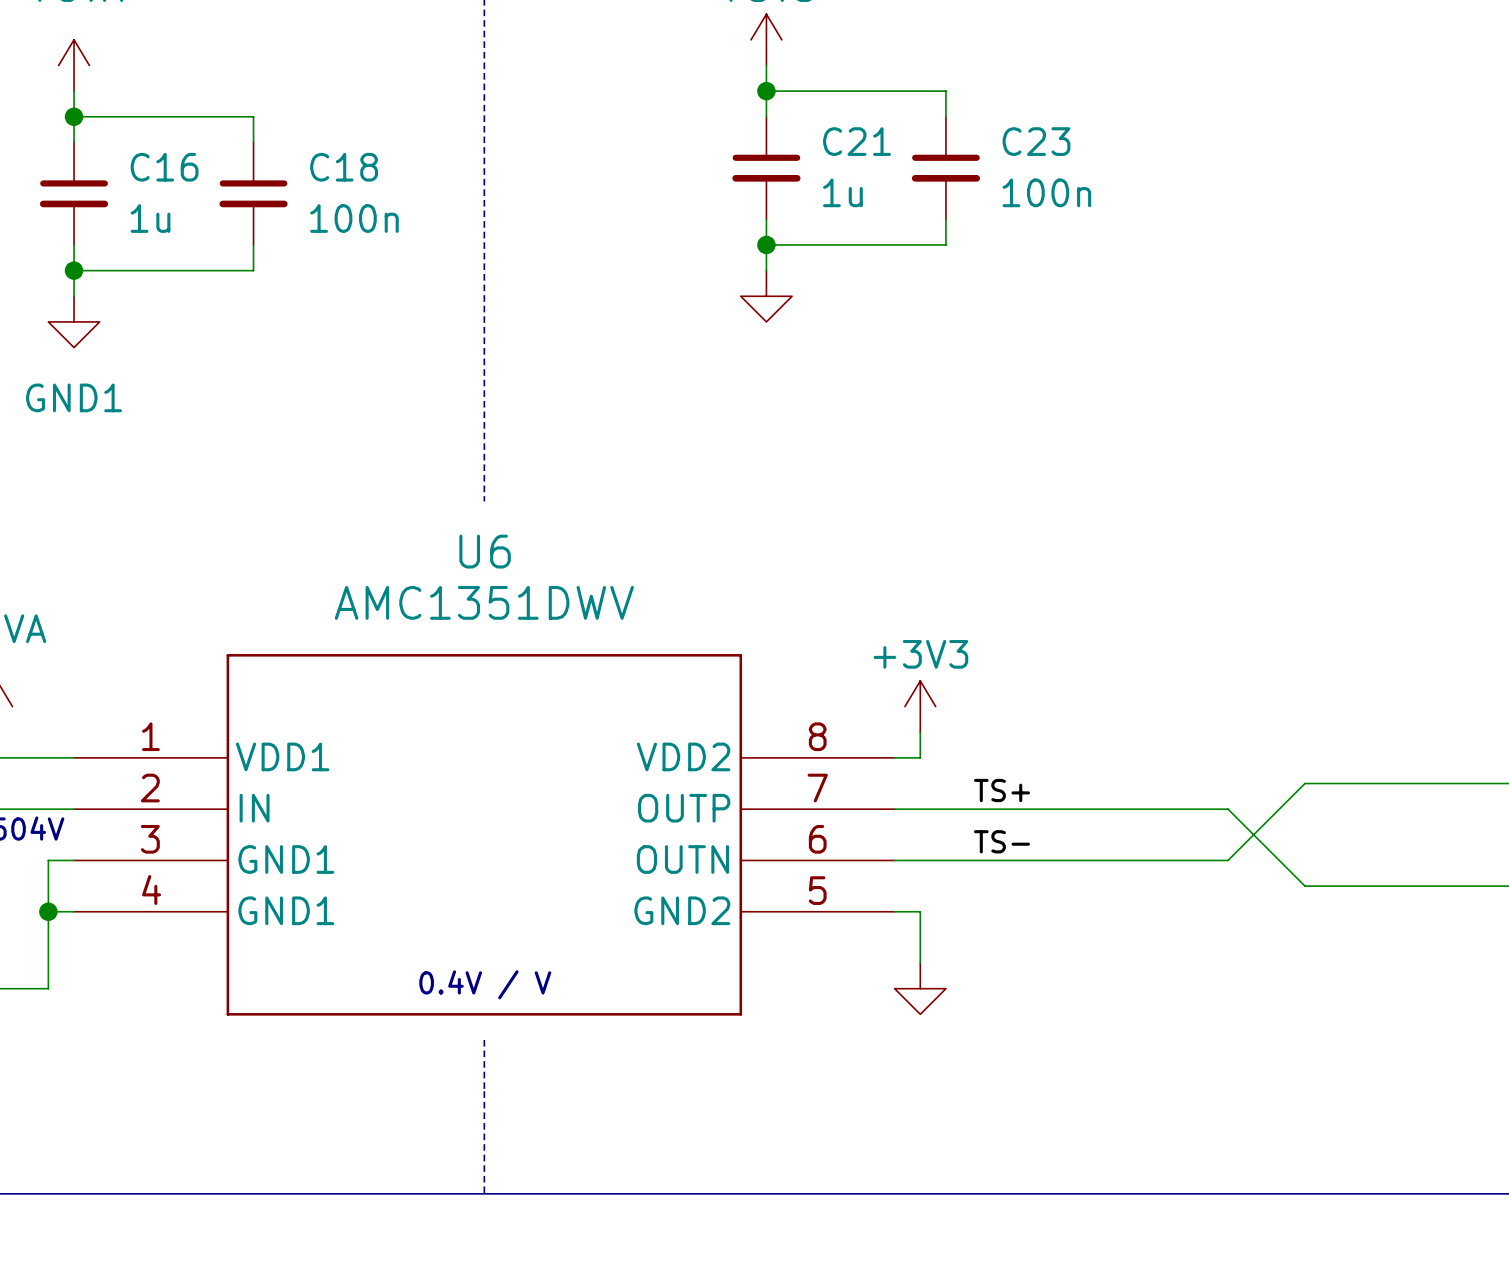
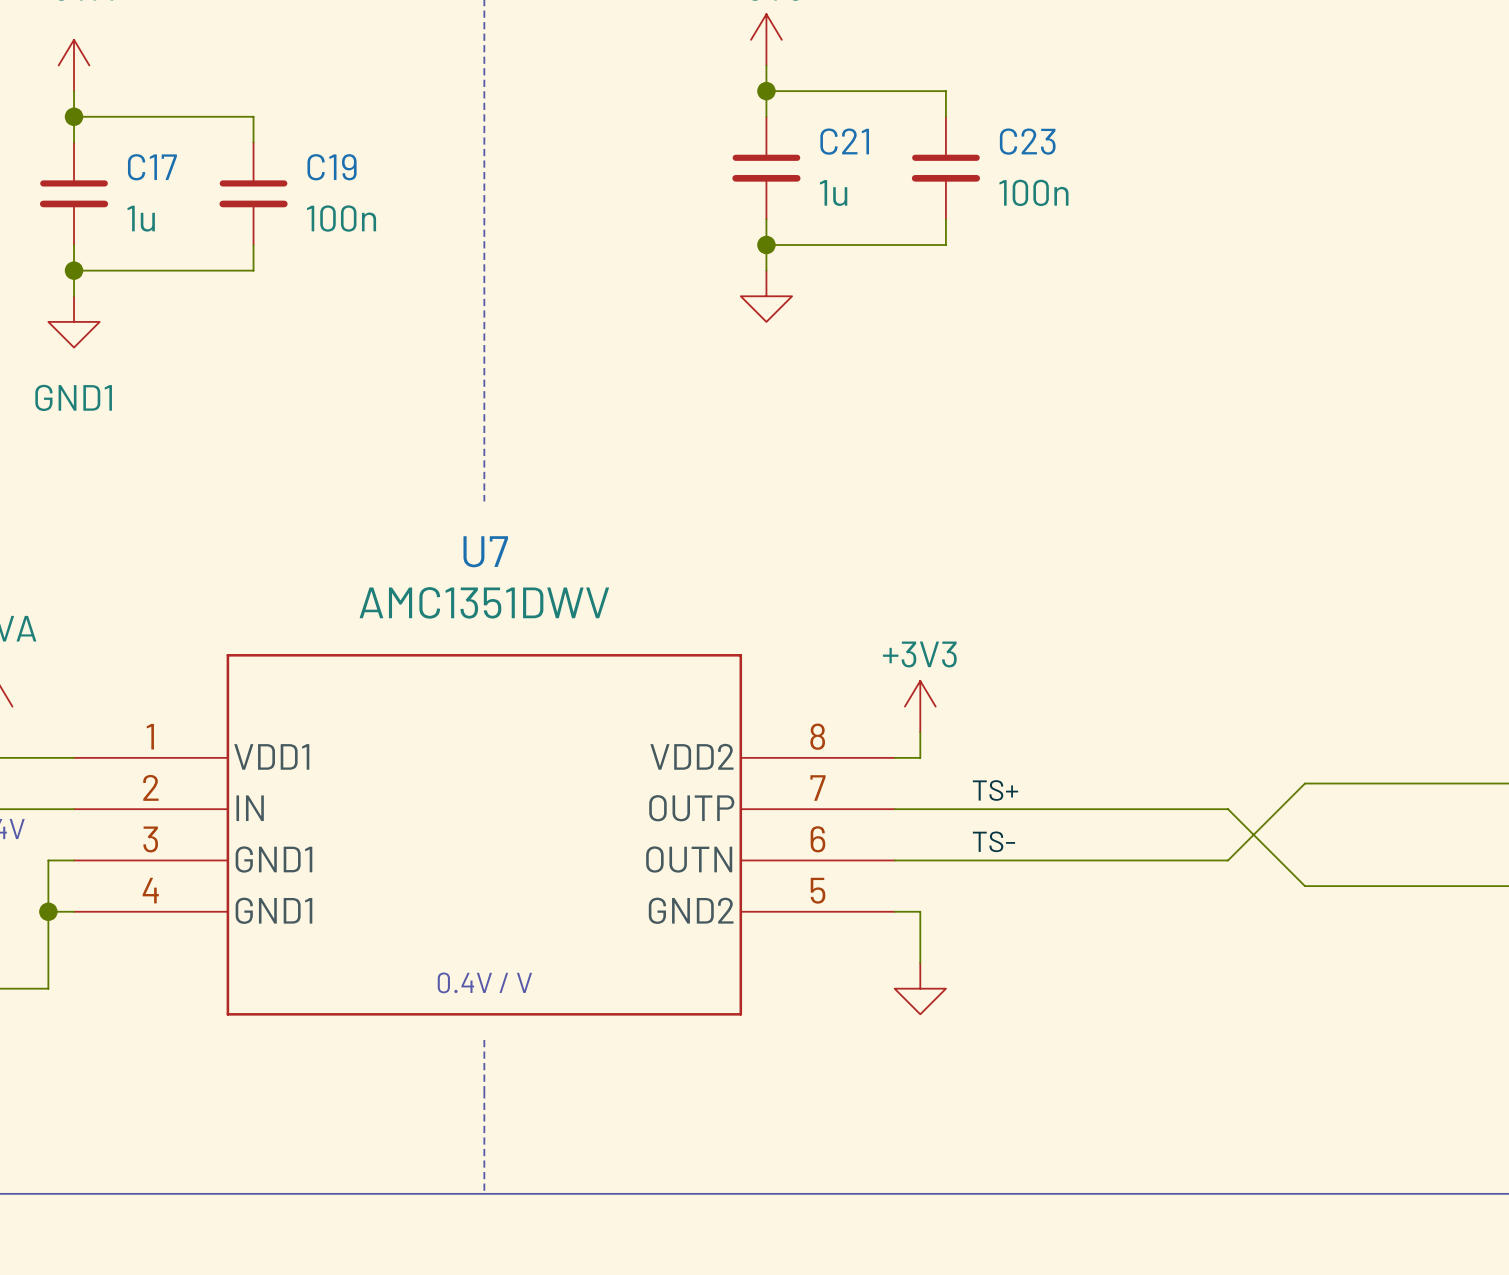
C16 name: C16 (164, 167) -> C17 (152, 167)
C18 name: C18 (344, 167) -> C19 (332, 167)
U6 name: U6 (485, 551) -> U7 (485, 551)

